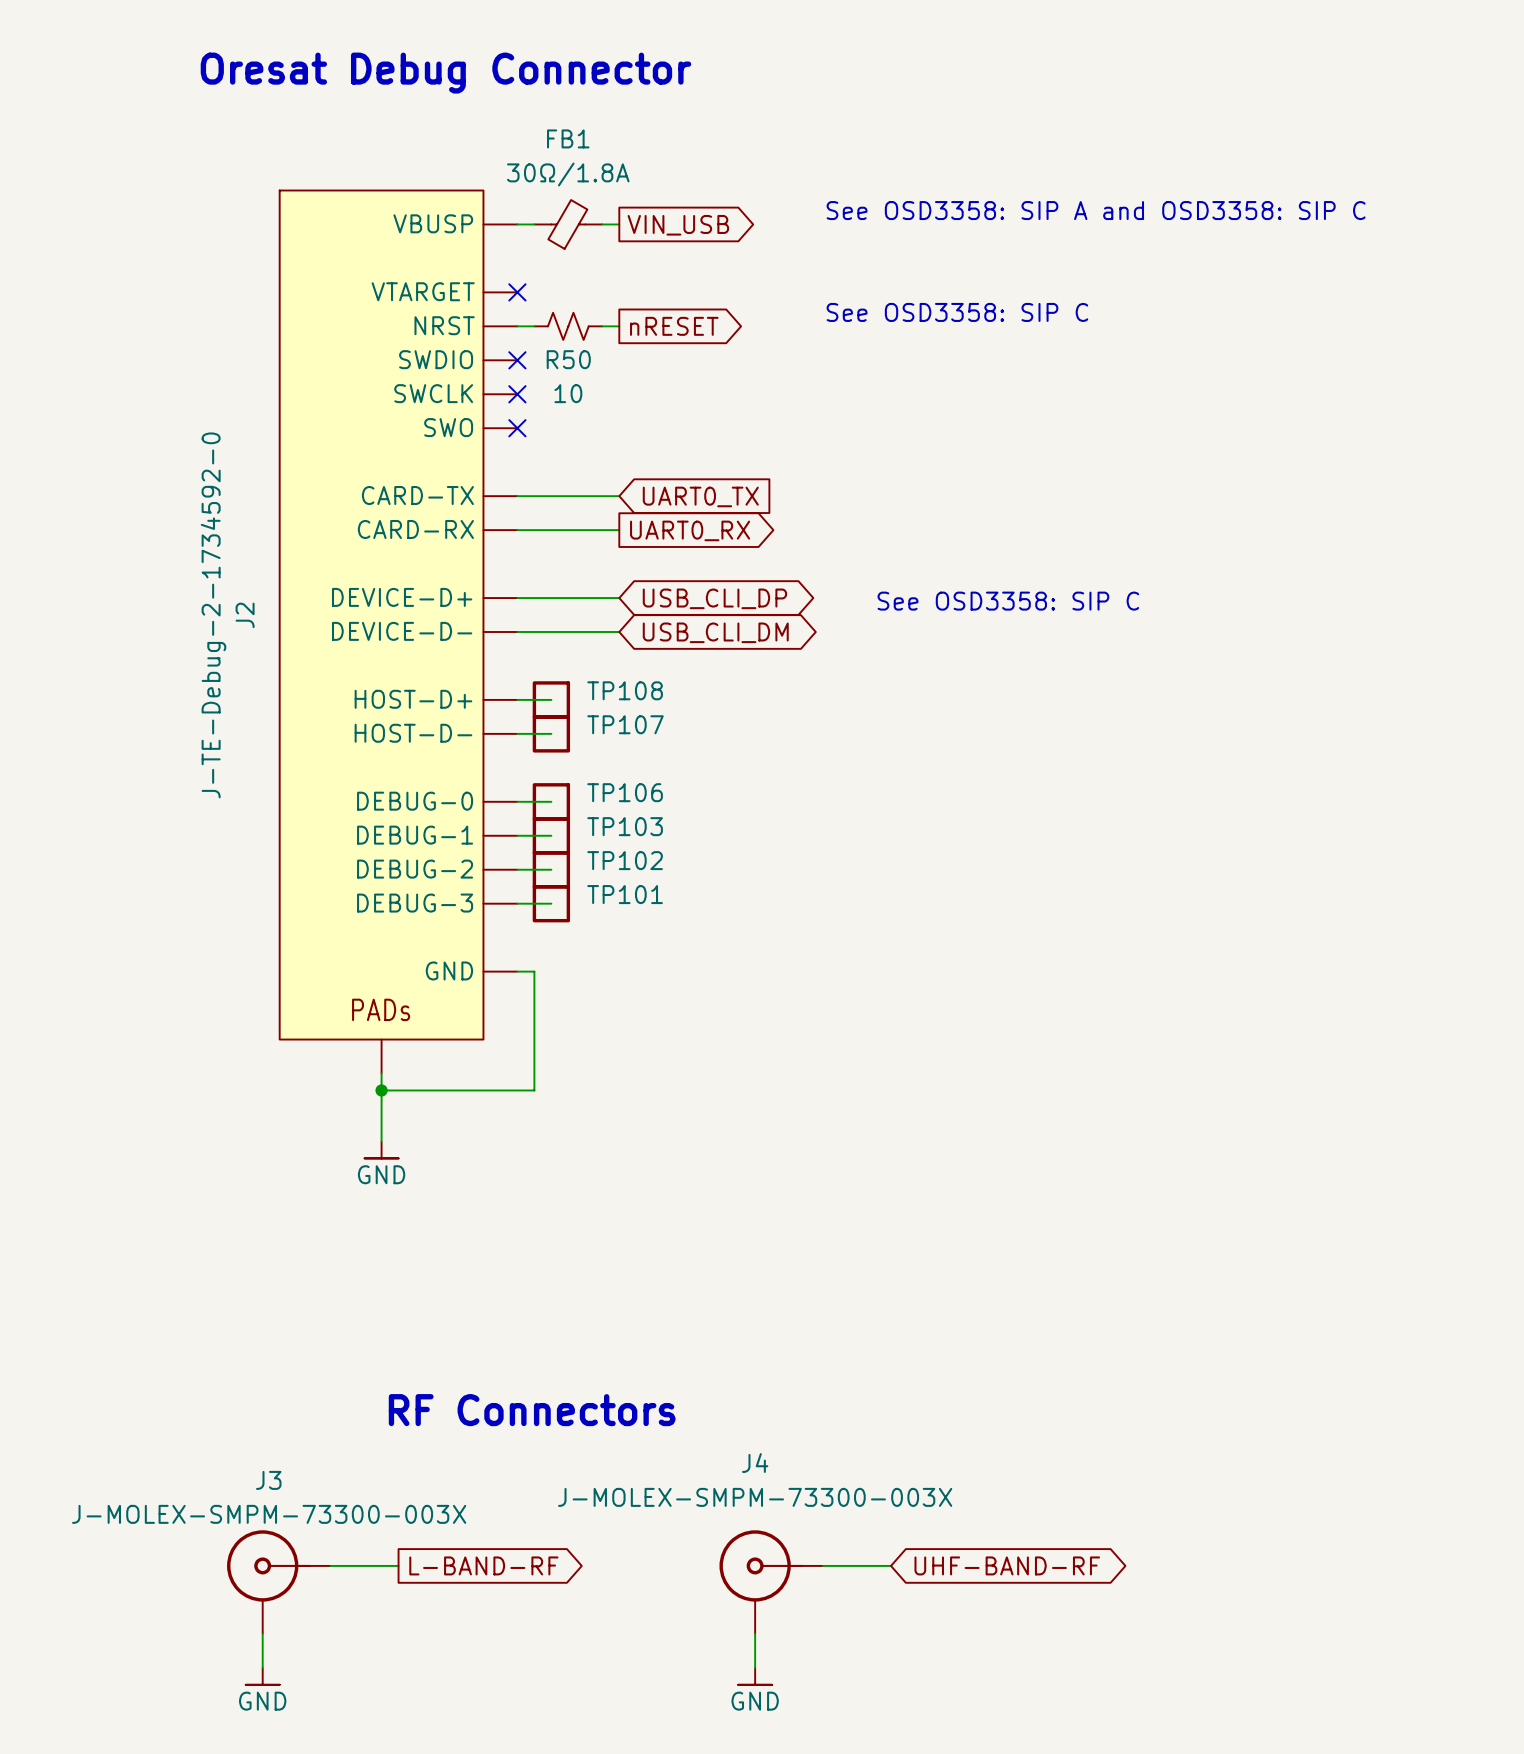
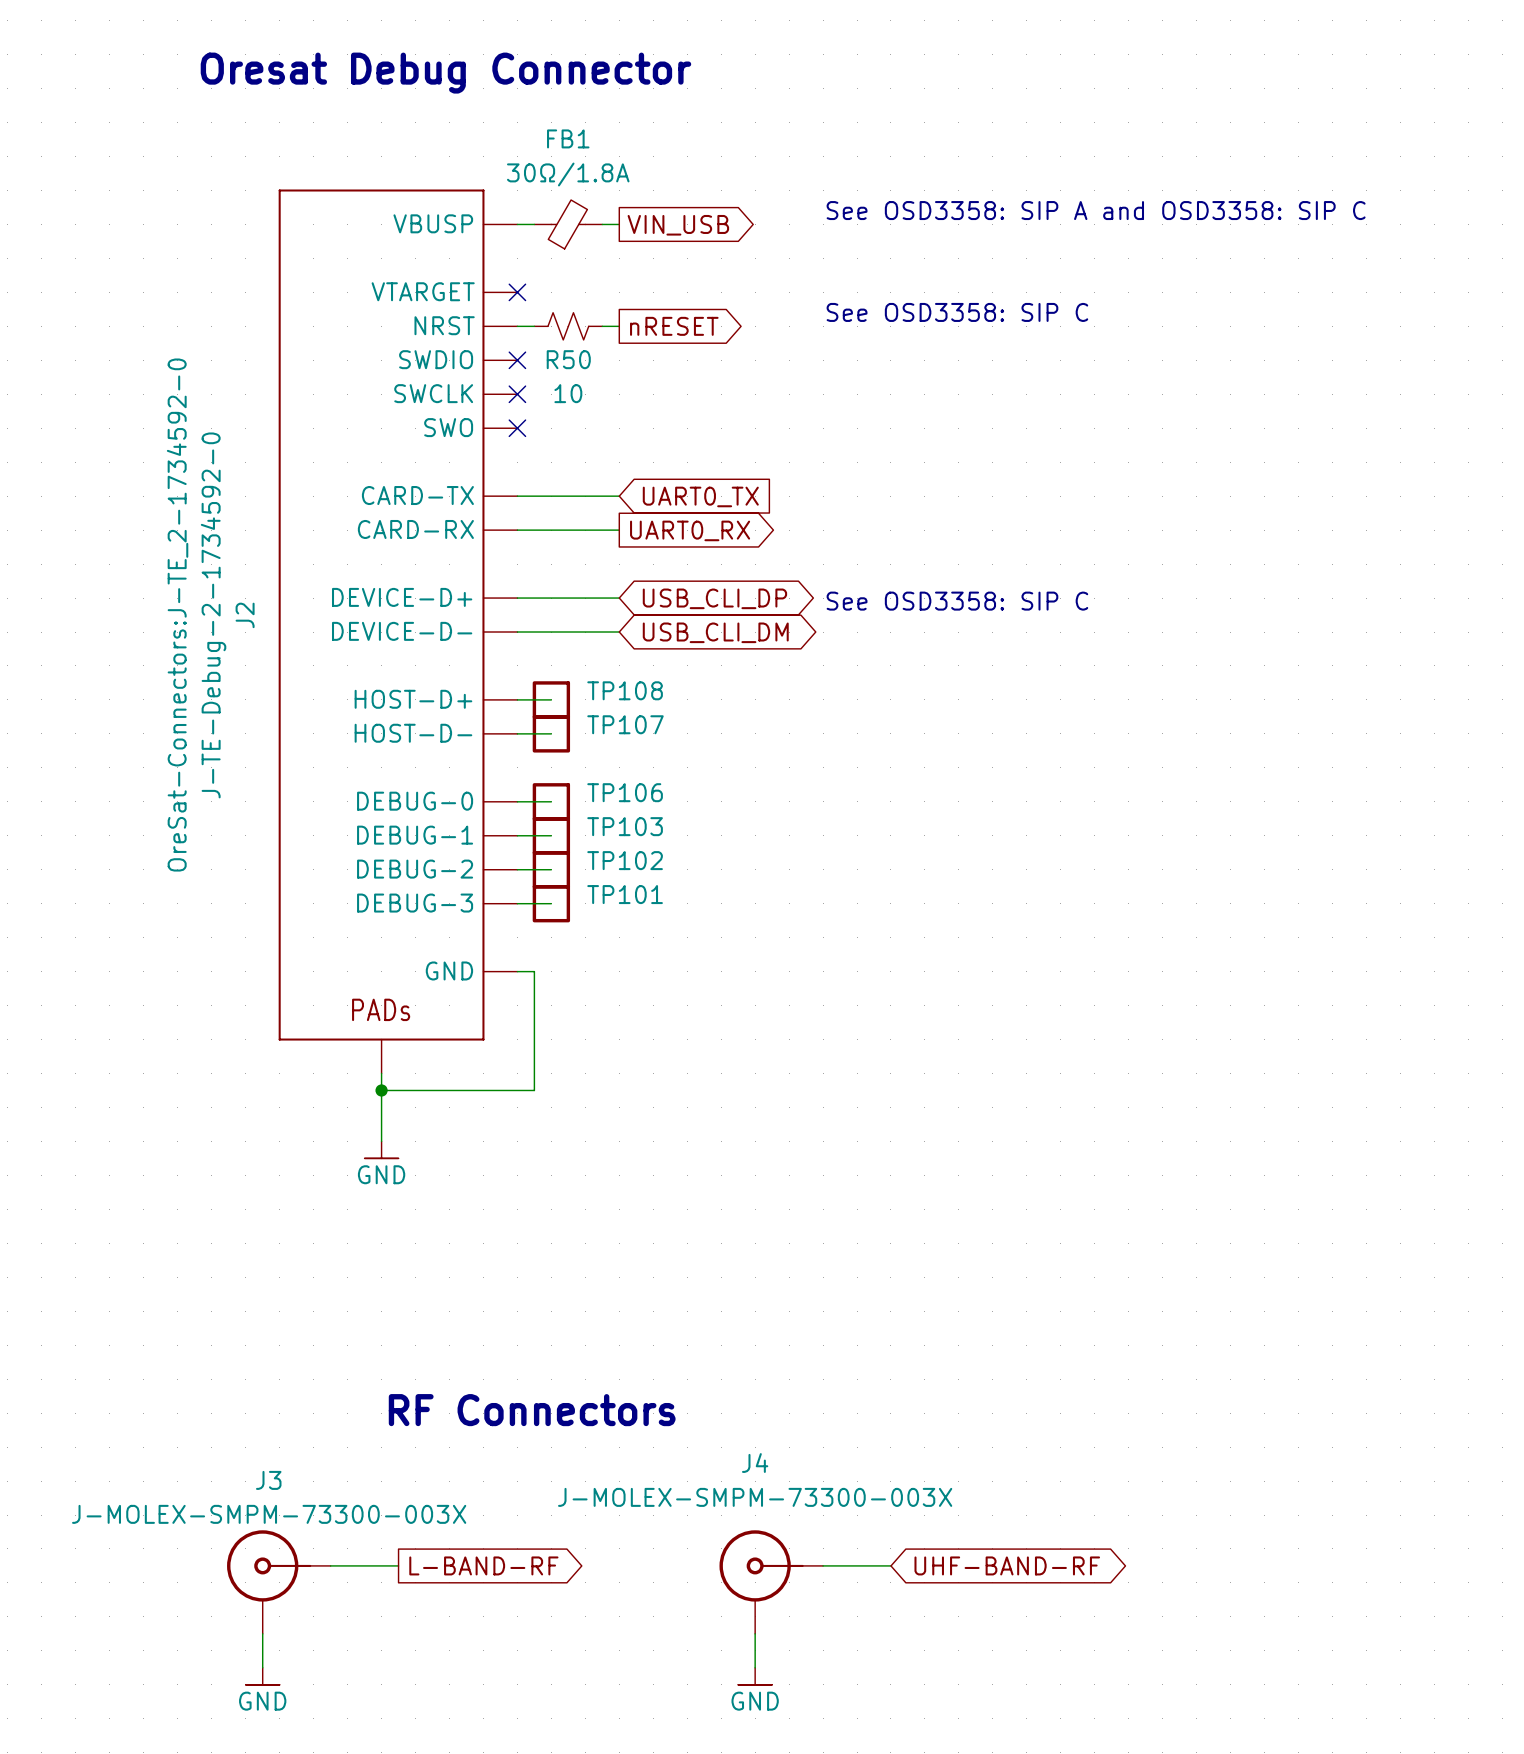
J2 symbol: [279, 190, 518, 1074] -> [278, 189, 518, 1074]
text position: See OSD3358: SIP C (1008, 601) -> See OSD3358: SIP C (957, 601)
J2 text: none -> OreSat-Connectors:J-TE_2-1734592-0 (177, 615)

